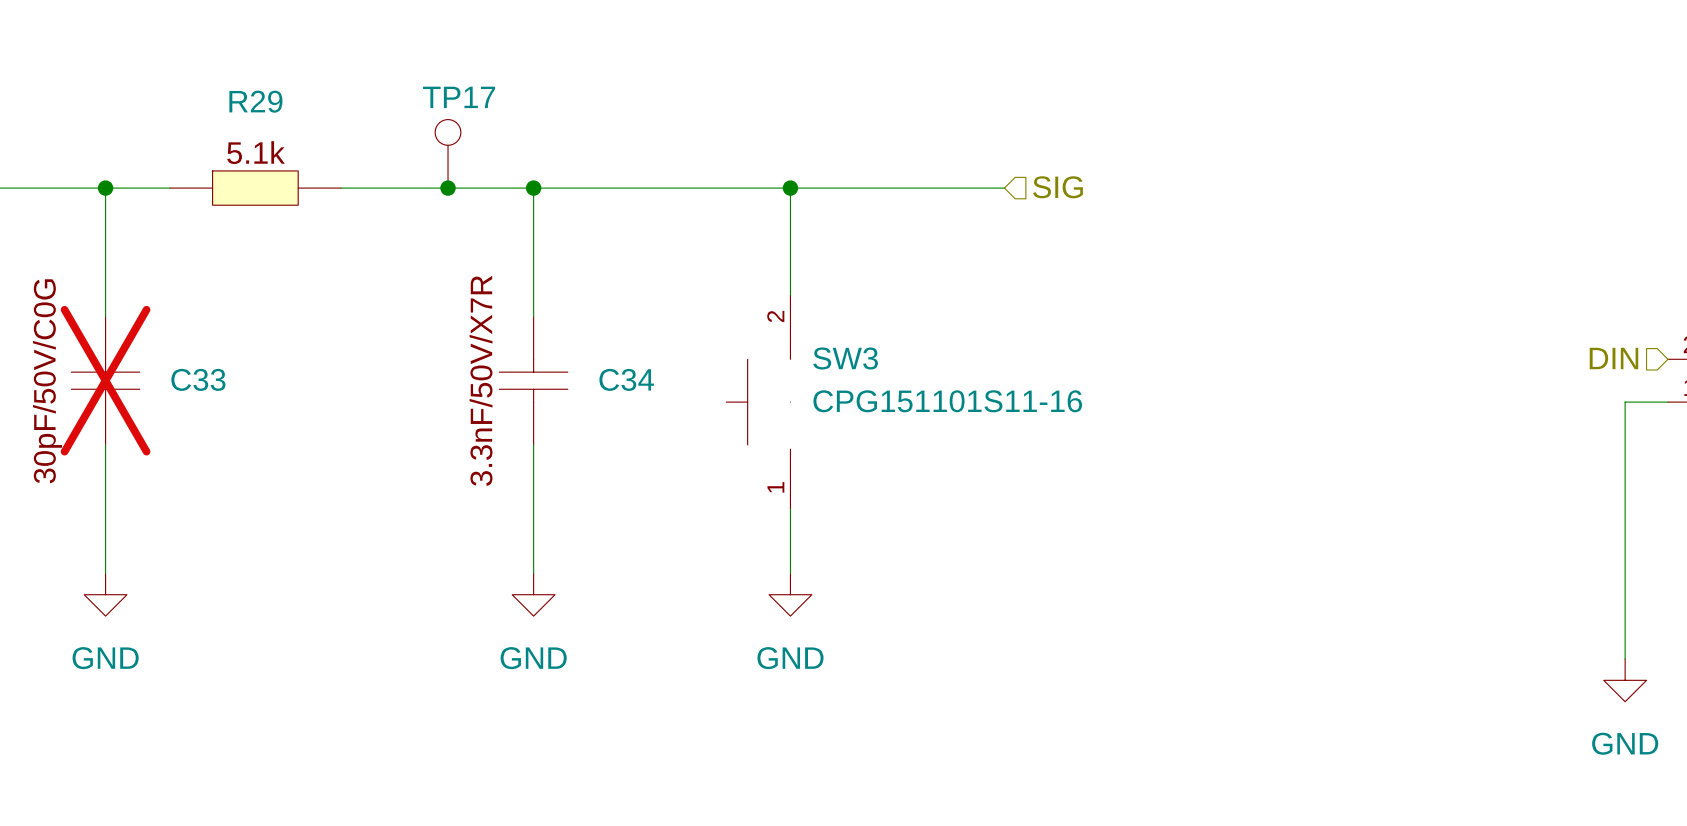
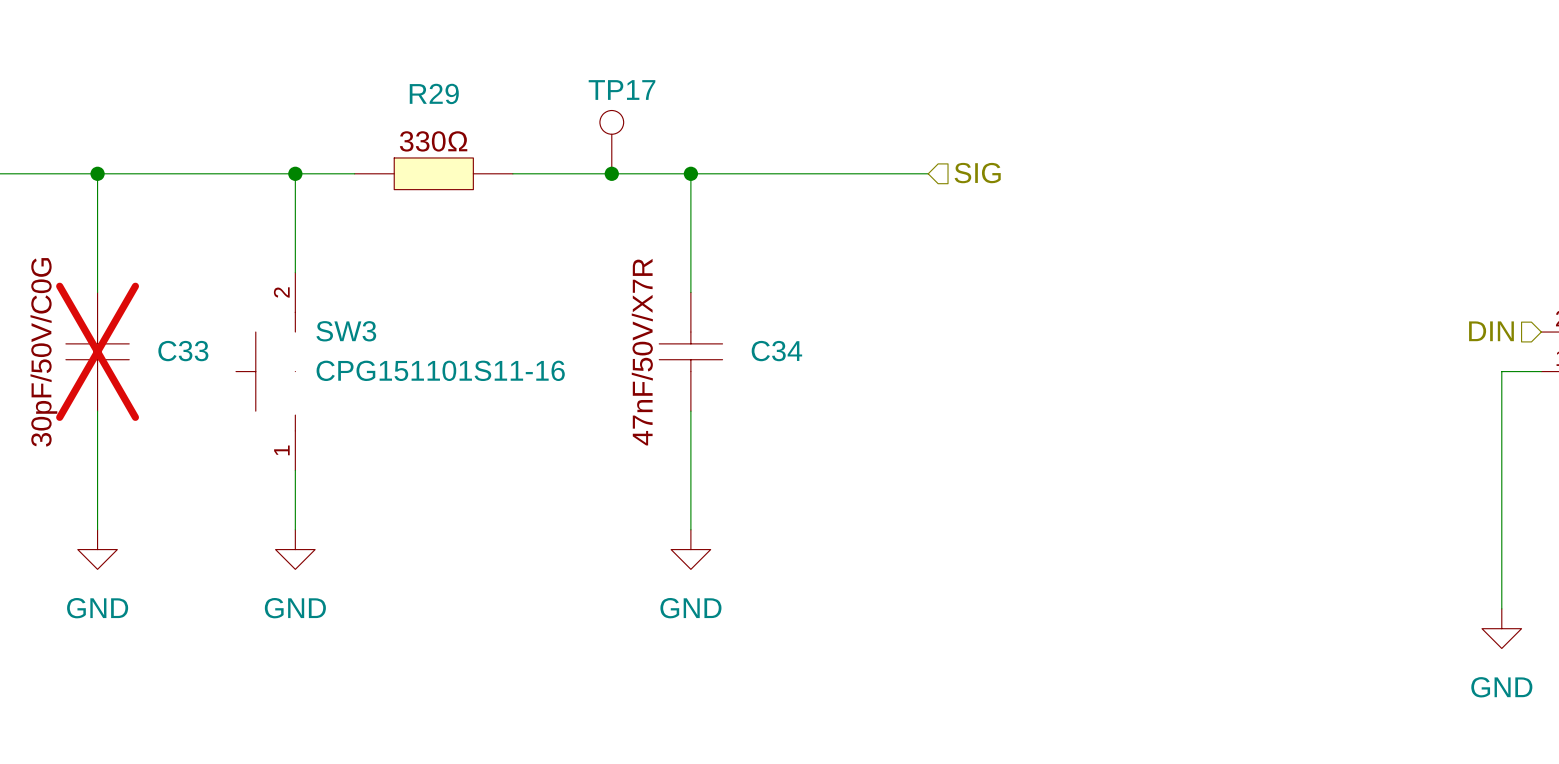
R29 text: 5.1k (256, 152) -> 330Ω (433, 141)
TP17 position: (448, 153) -> (611, 142)
R29 position: (255, 188) -> (433, 173)
wire: none -> (295, 173) (295, 272)
junction: none -> (295, 173)
junction: (448, 188) -> none
wire: (533, 188) (533, 316) -> (690, 173) (690, 292)
junction: (533, 188) -> none
junction: none -> (611, 173)
wire: (790, 188) (790, 295) -> none
junction position: (790, 188) -> (690, 173)
C34 text: 3.3nF/50V/X7R (481, 380) -> 47nF/50V/X7R (642, 352)
C34 position: (533, 380) -> (690, 351)
SW3 position: (758, 402) -> (265, 371)
wire: (533, 444) (533, 573) -> (690, 411) (690, 529)
wire: none -> (295, 470) (295, 529)
wire: (790, 509) (790, 573) -> none
power symbol: none -> GND (295, 549)
power symbol: GND (533, 594) -> none
power symbol position: GND (790, 594) -> GND (690, 549)

